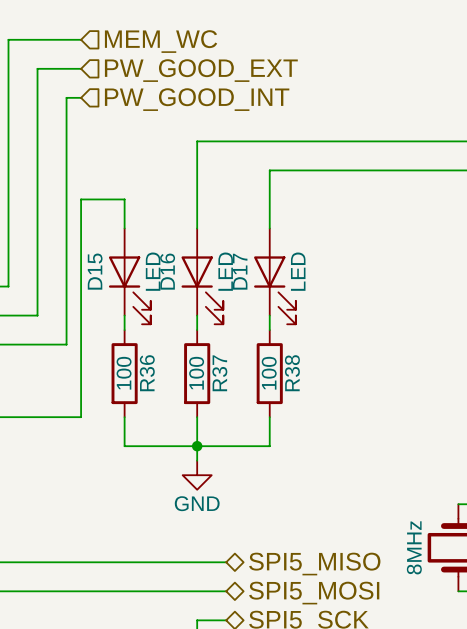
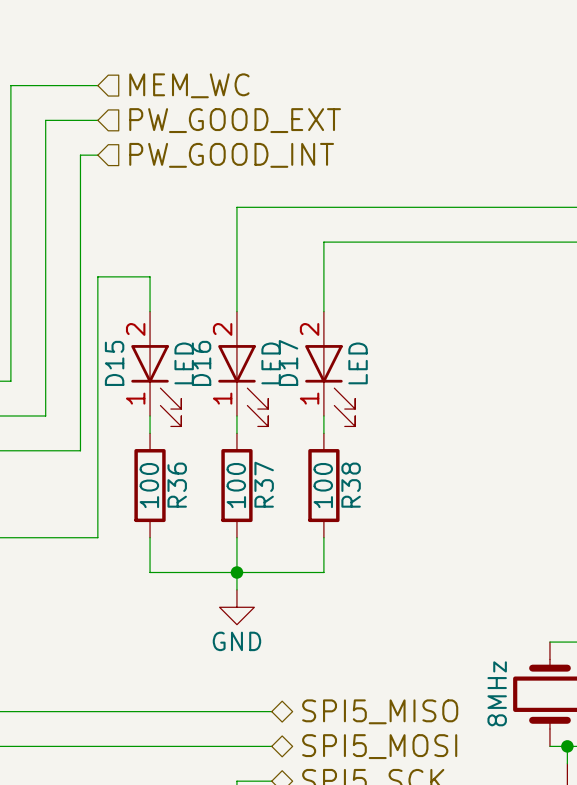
D15 pin number: none -> 2 (135, 329)
D16 pin number: none -> 2 (222, 329)
D17 pin number: none -> 2 (309, 329)
D15 pin number: none -> 1 (135, 398)
D16 pin number: none -> 1 (222, 398)
D17 pin number: none -> 1 (309, 398)

